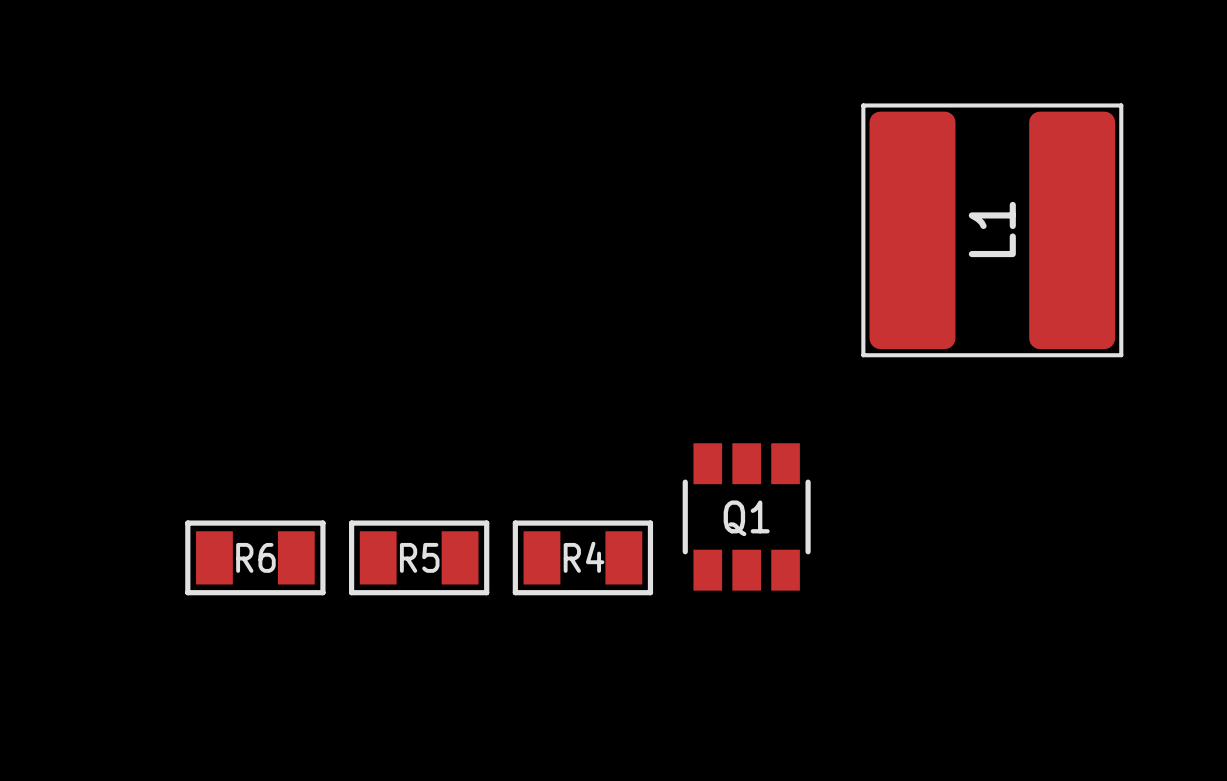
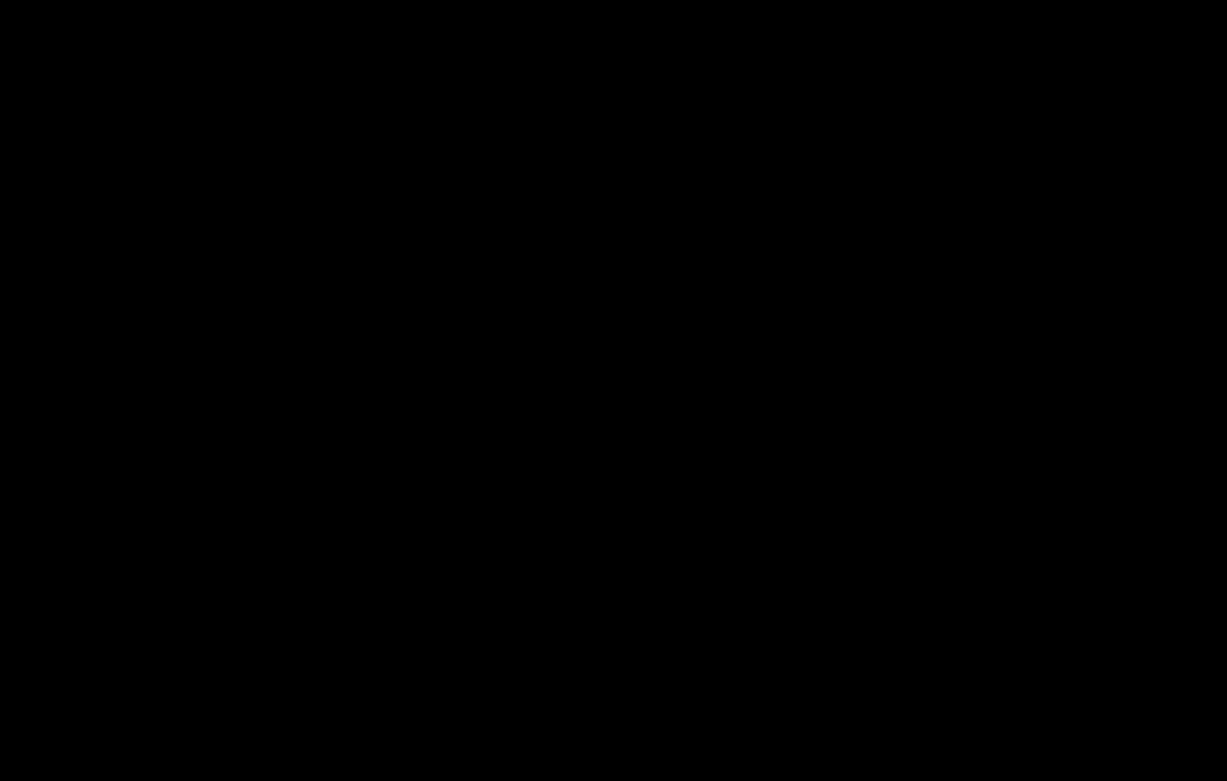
L1: (992, 230) -> none
Q1: (746, 516) -> none
R6: (255, 557) -> none
R5: (419, 557) -> none
R4: (582, 557) -> none

